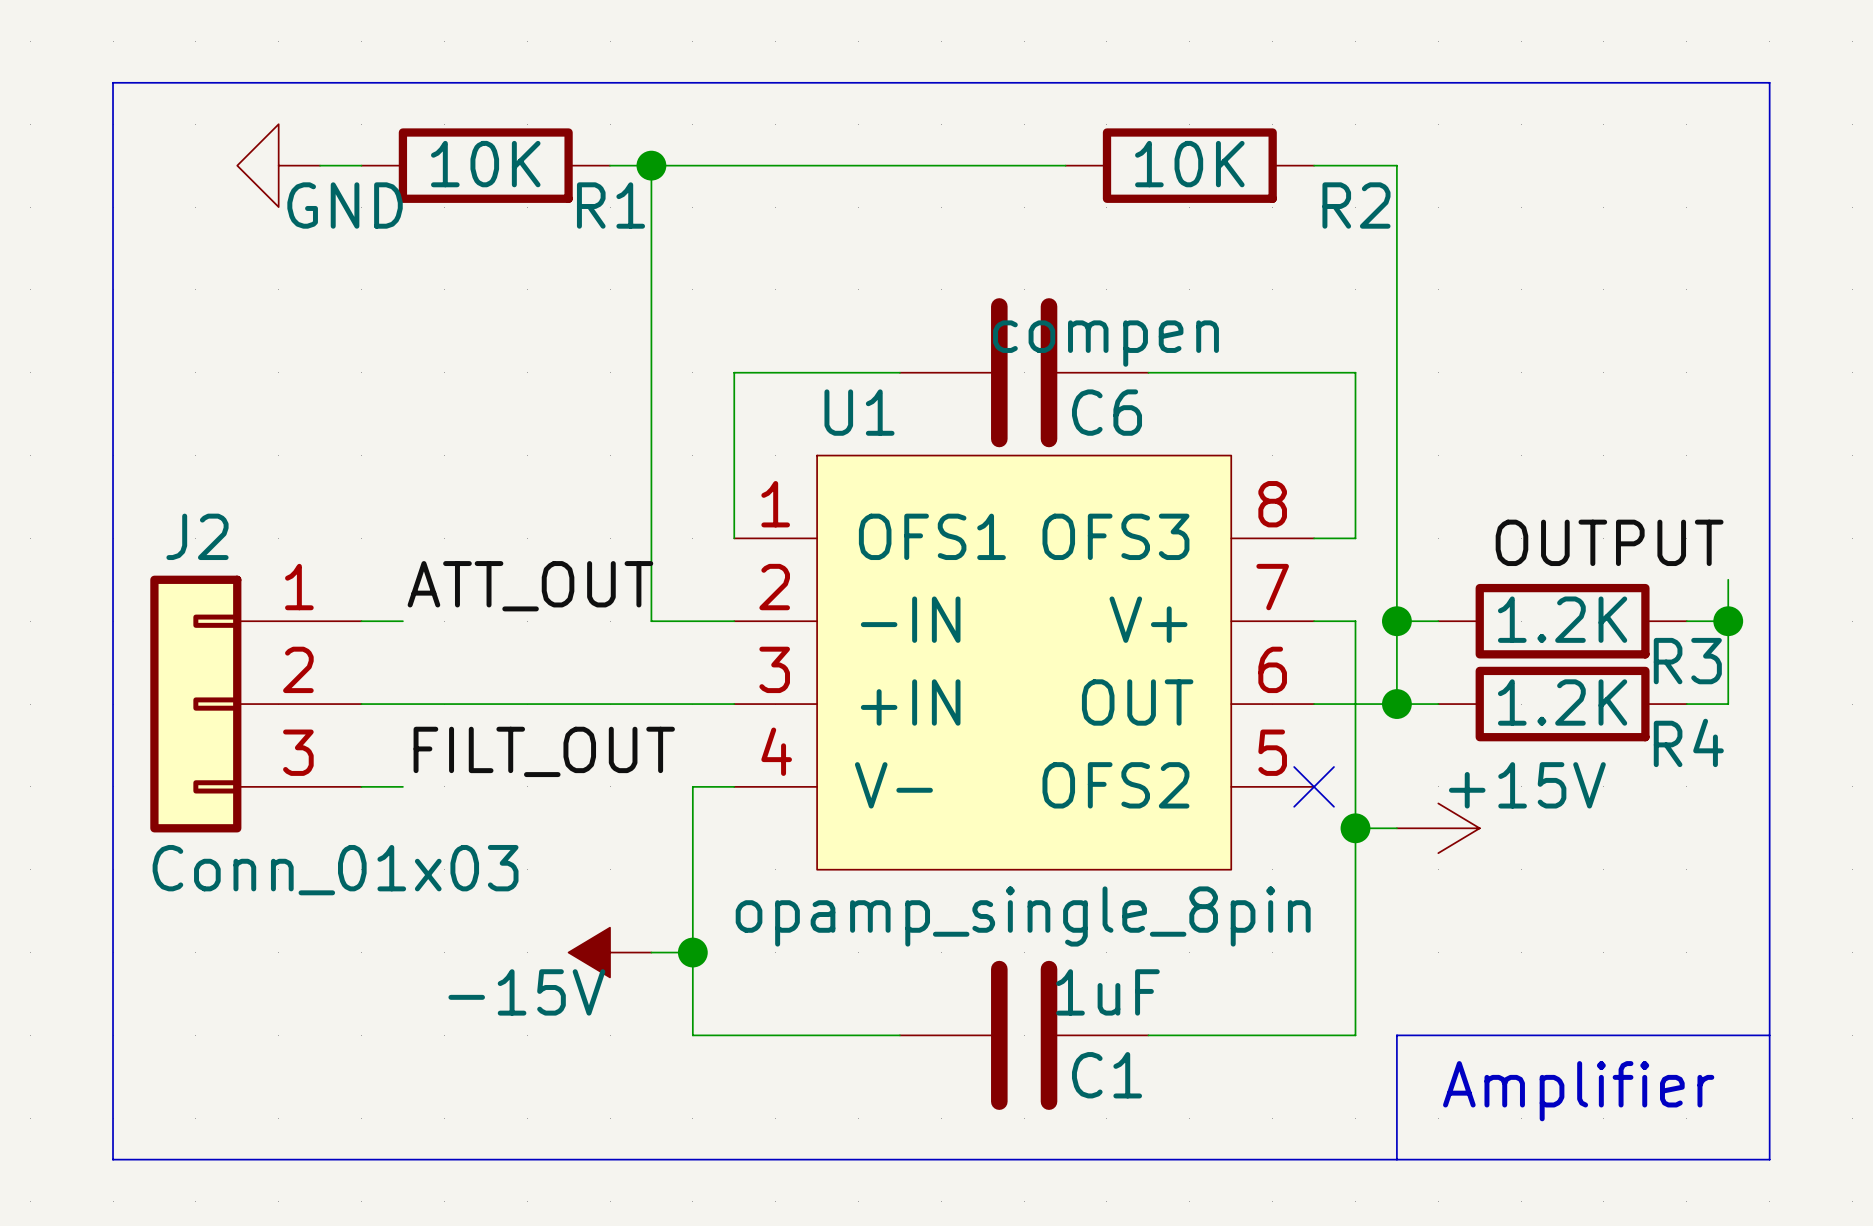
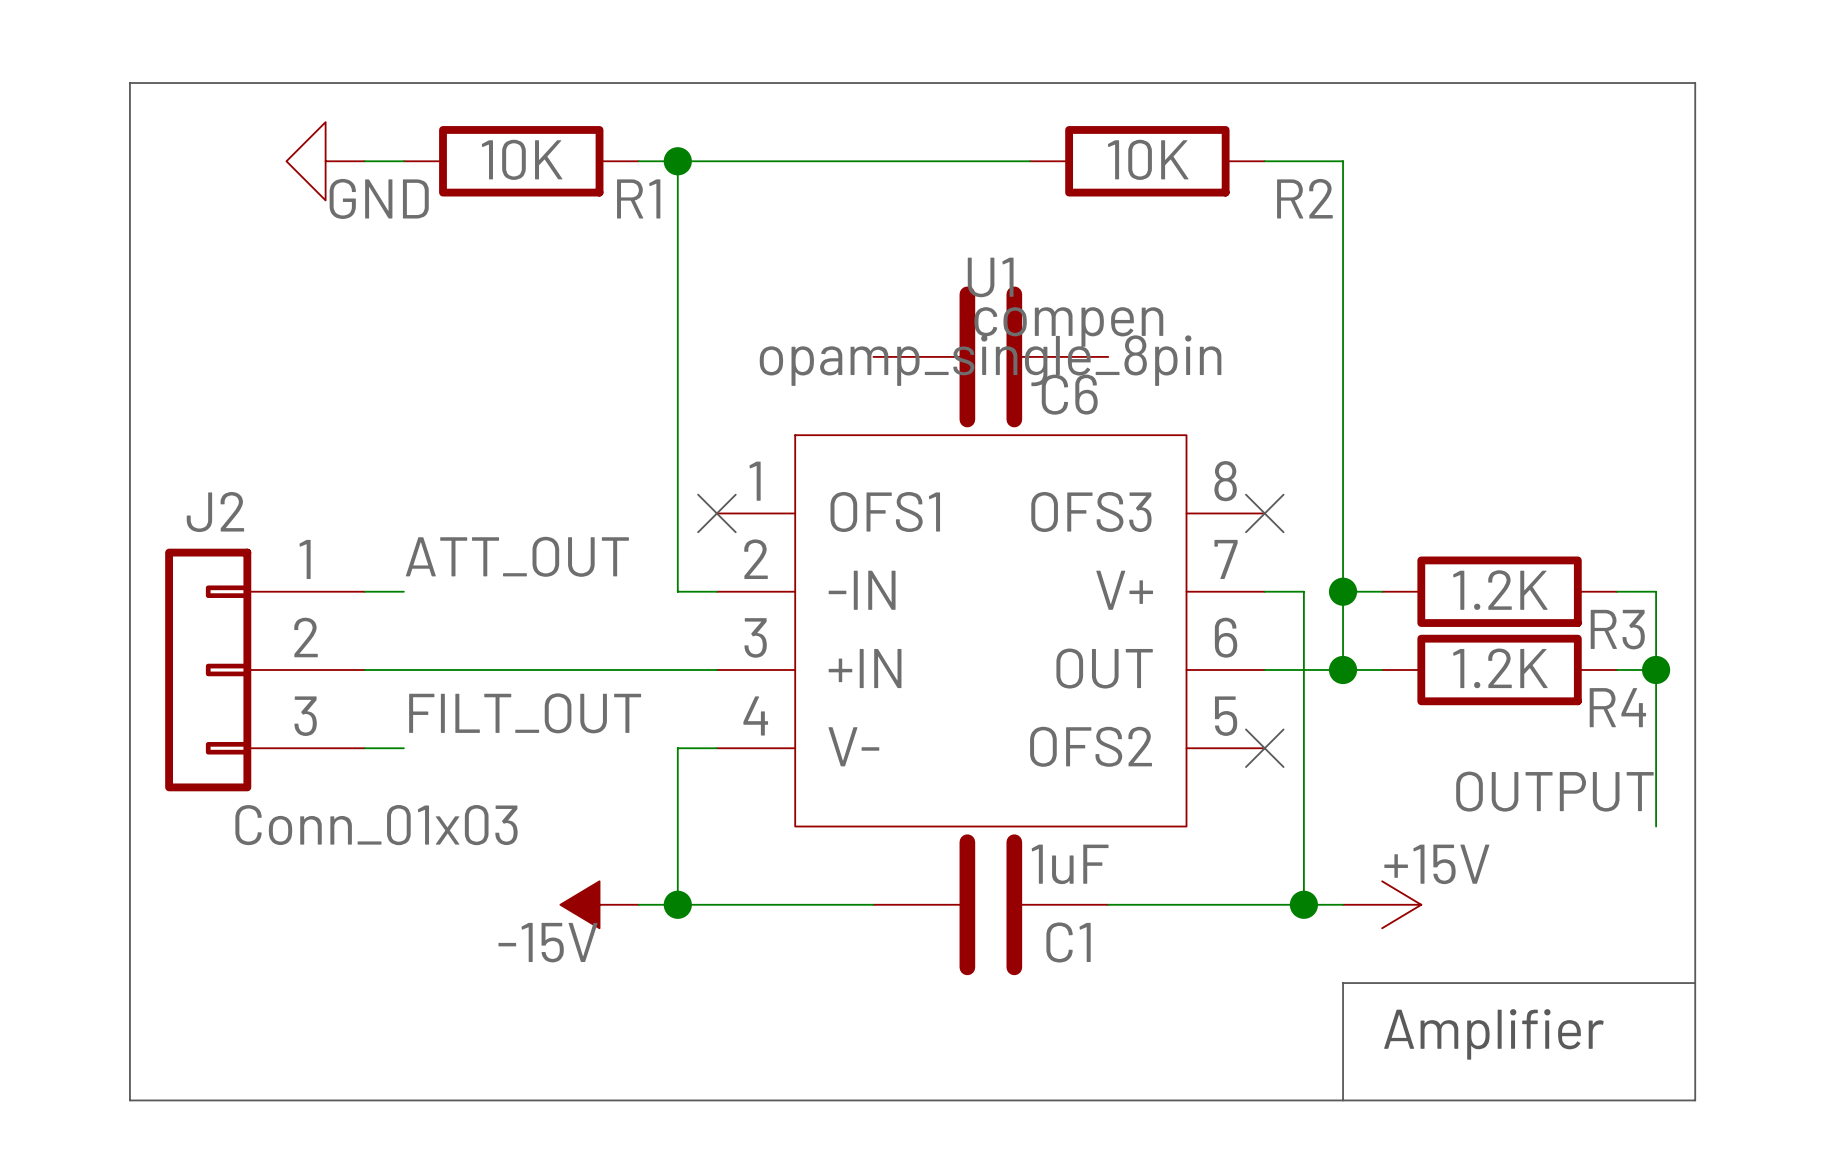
power symbol position: GND (278, 165) -> GND (325, 161)
R1 position: (485, 165) -> (521, 161)
wire: (610, 165) (651, 165) (651, 621) (692, 621) -> (677, 161) (677, 591)
junction position: (651, 165) -> (677, 161)
wire: (899, 372) (734, 372) (734, 538) -> none
wire: (1148, 372) (1355, 372) (1355, 538) (1314, 538) -> none
U1 name position: U1 (859, 412) -> U1 (990, 277)
no-connect mark: none -> (716, 513)
no-connect mark: none -> (1264, 513)
label position: OUTPUT (1609, 542) -> OUTPUT (1554, 791)
wire: (1728, 579) (1728, 621) -> none
junction position: (1728, 621) -> (1656, 669)
wire: none -> (1656, 669) (1656, 826)
wire: (1355, 828) (1396, 828) -> none
junction position: (1355, 828) -> (1303, 904)
power symbol position: +15V (1438, 828) -> +15V (1382, 904)
U1 value position: opamp_single_8pin (1023, 916) -> opamp_single_8pin (990, 360)
wire: (692, 952) (692, 1035) (899, 1035) -> (677, 904) (873, 904)
wire: none -> (1108, 904) (1343, 904)
wire: (1355, 952) (1355, 1035) (1148, 1035) -> none
C1 position: (1024, 1035) -> (990, 904)

